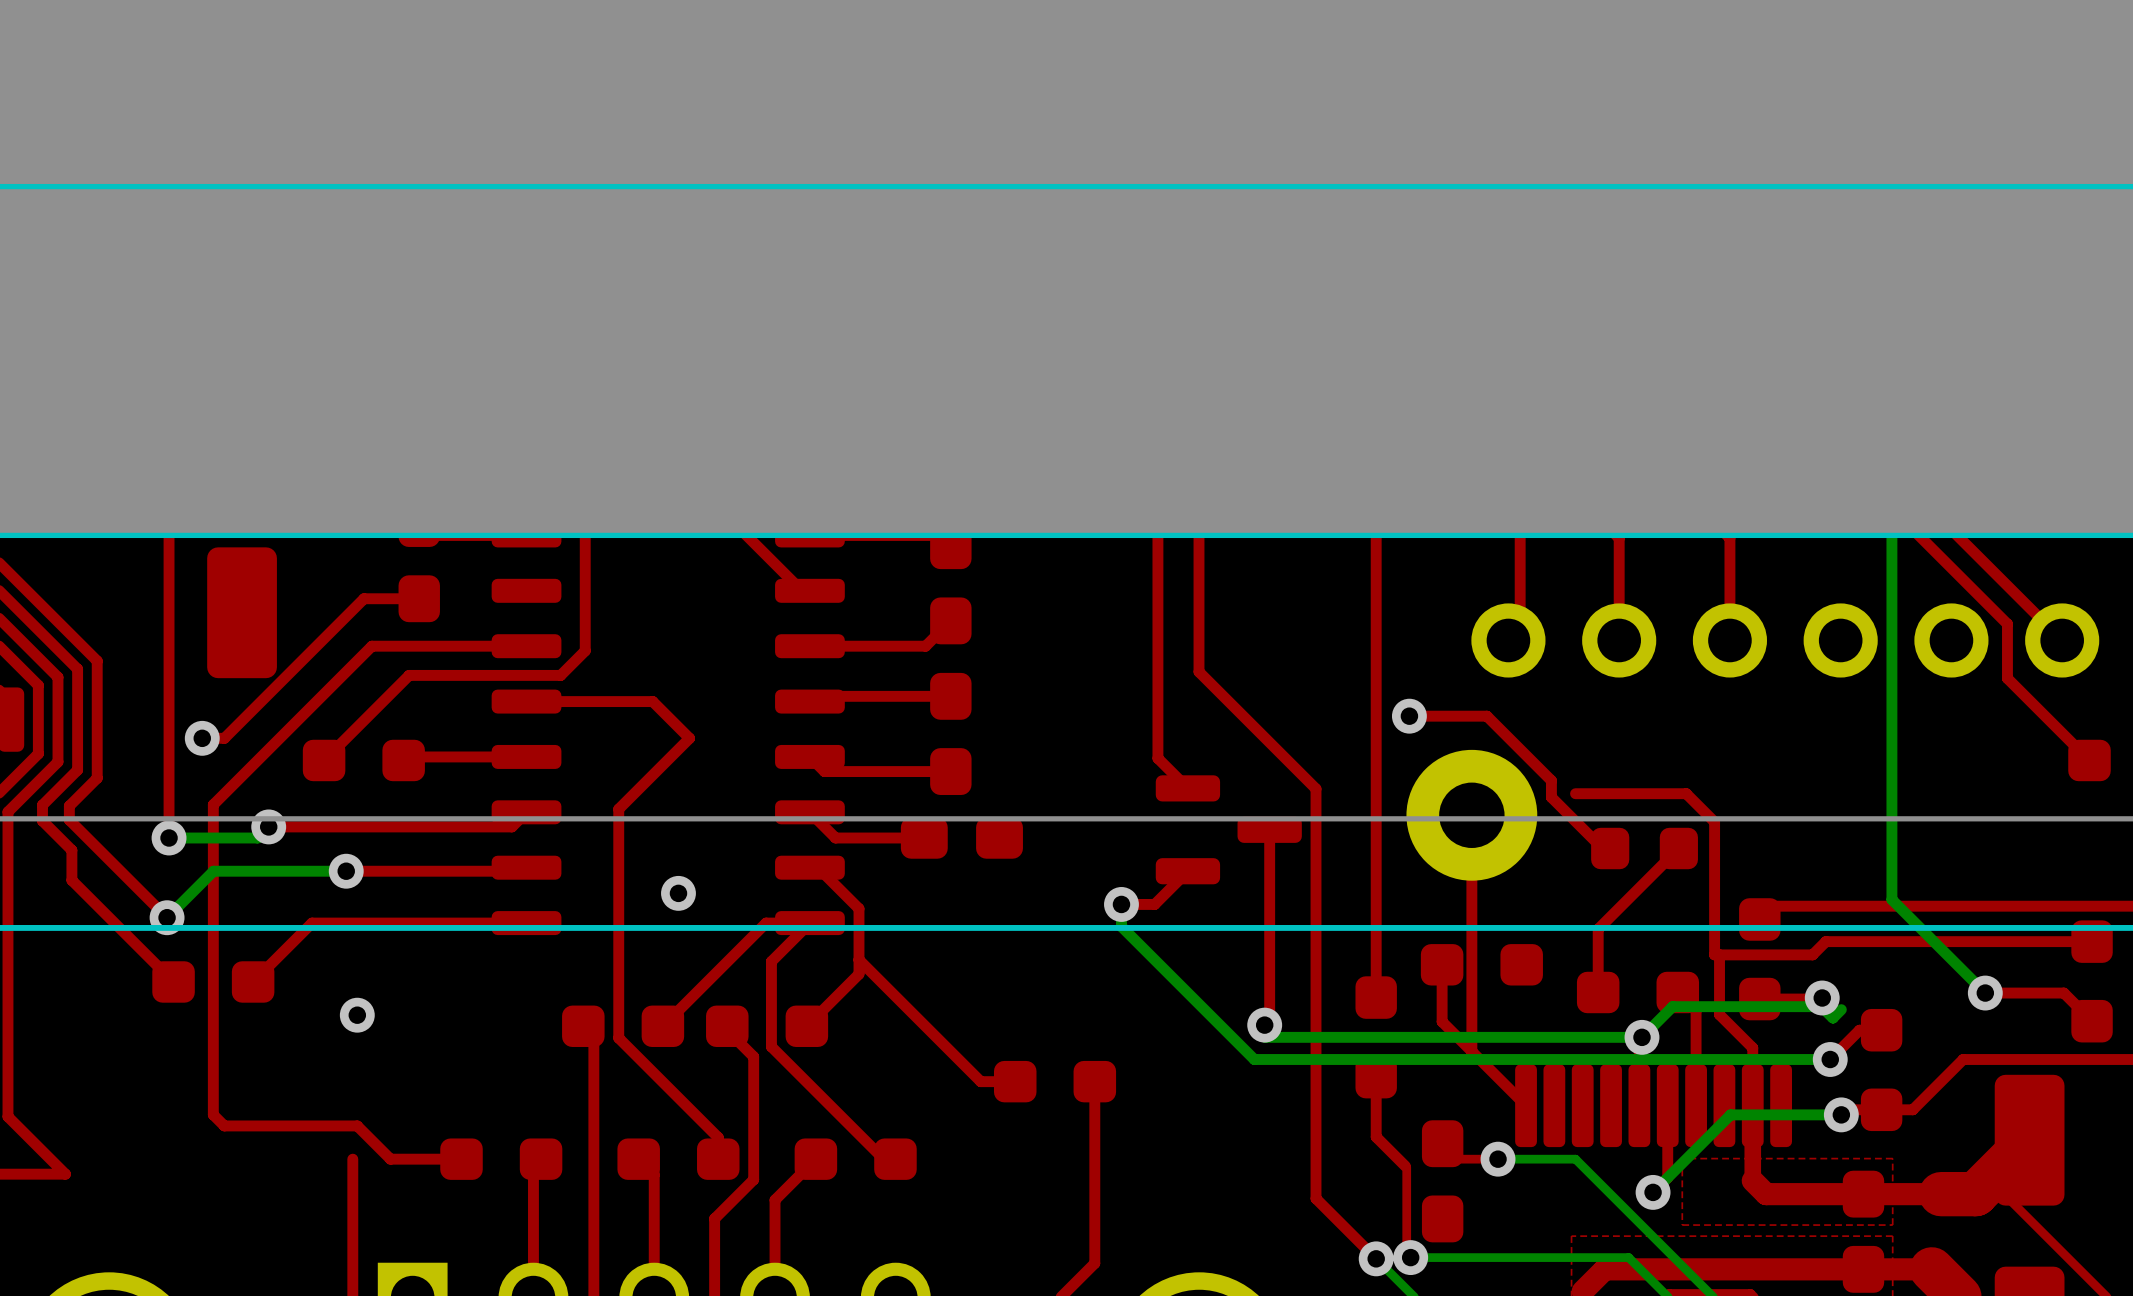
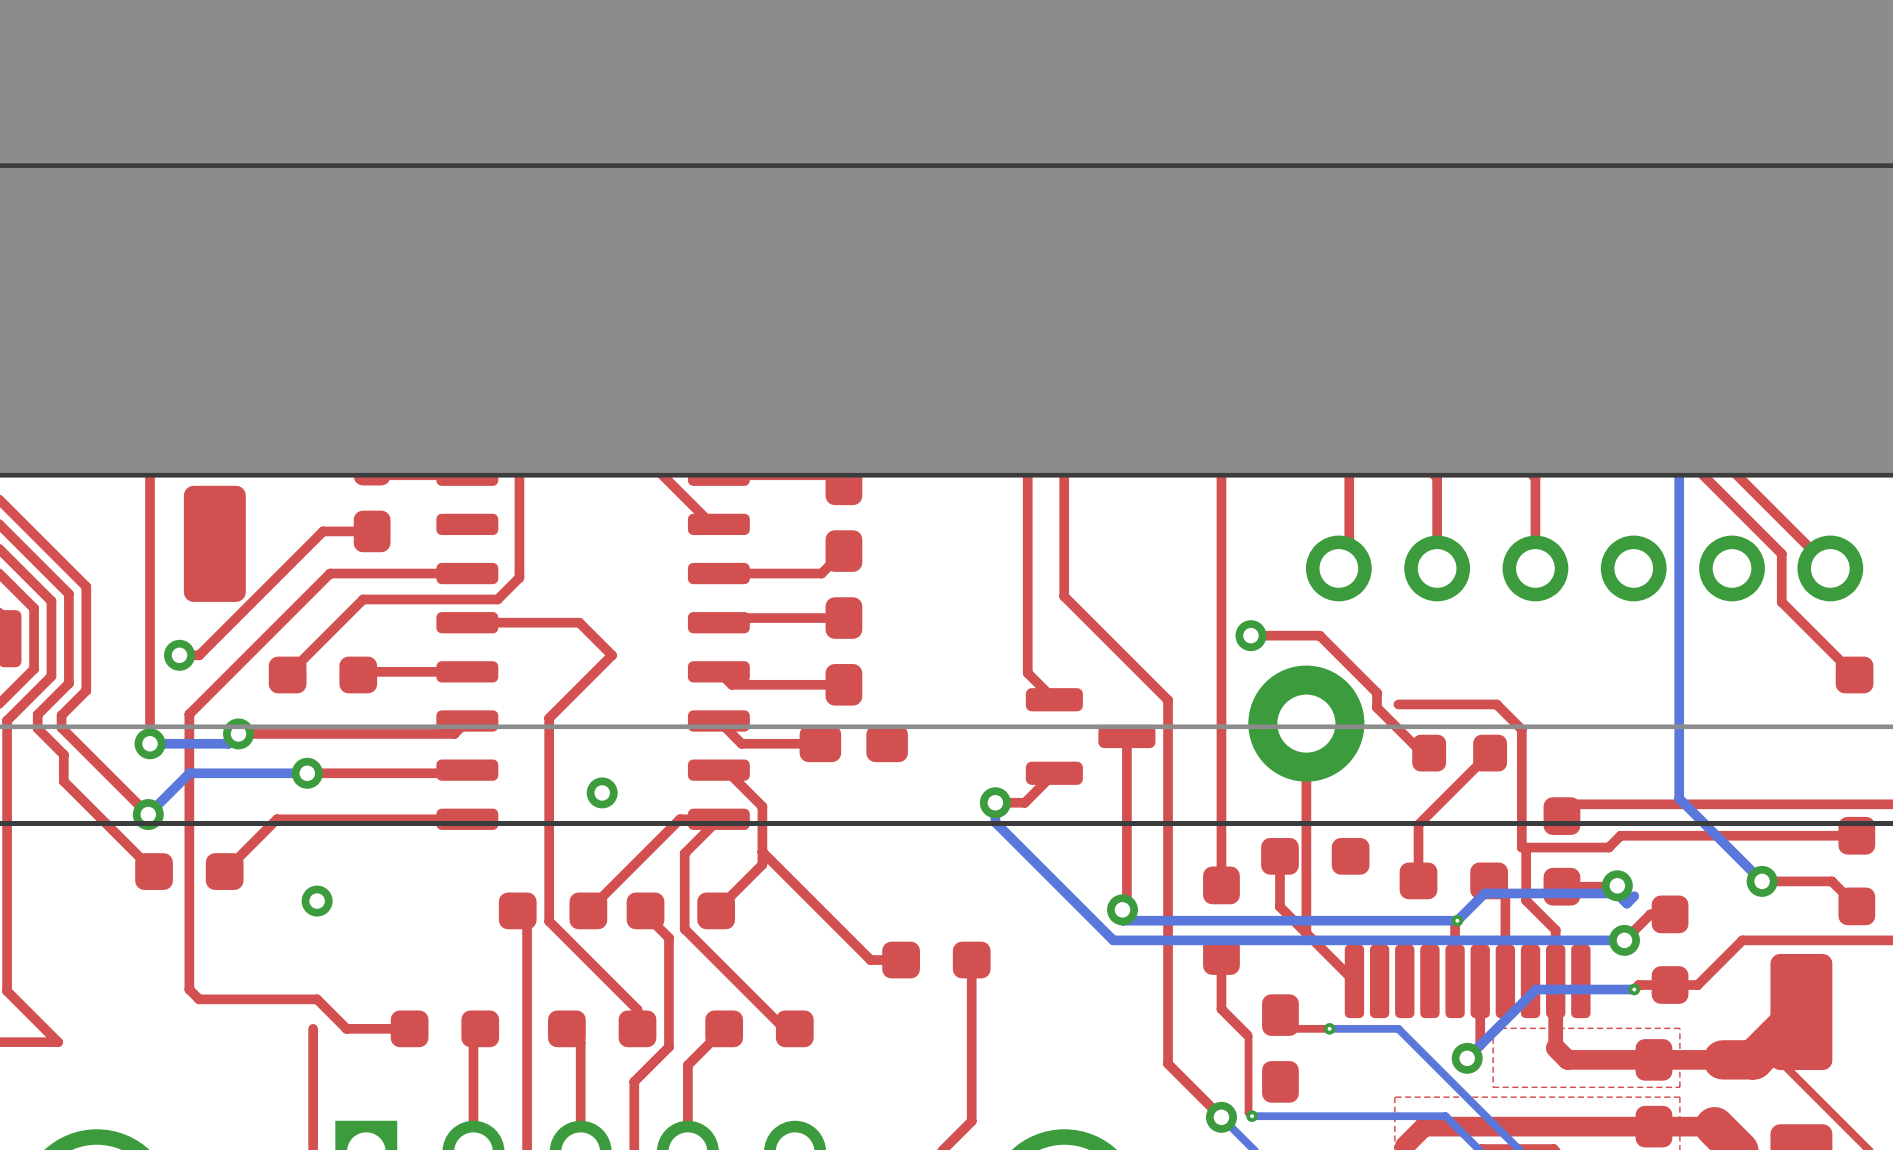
via size: [1624, 1019, 1660, 1055] -> [1451, 914, 1464, 927]
via size: [1823, 1097, 1859, 1133] -> [1628, 983, 1641, 996]
via size: [1480, 1141, 1516, 1177] -> [1323, 1023, 1336, 1035]
via size: [1393, 1240, 1429, 1276] -> [1246, 1110, 1258, 1123]

